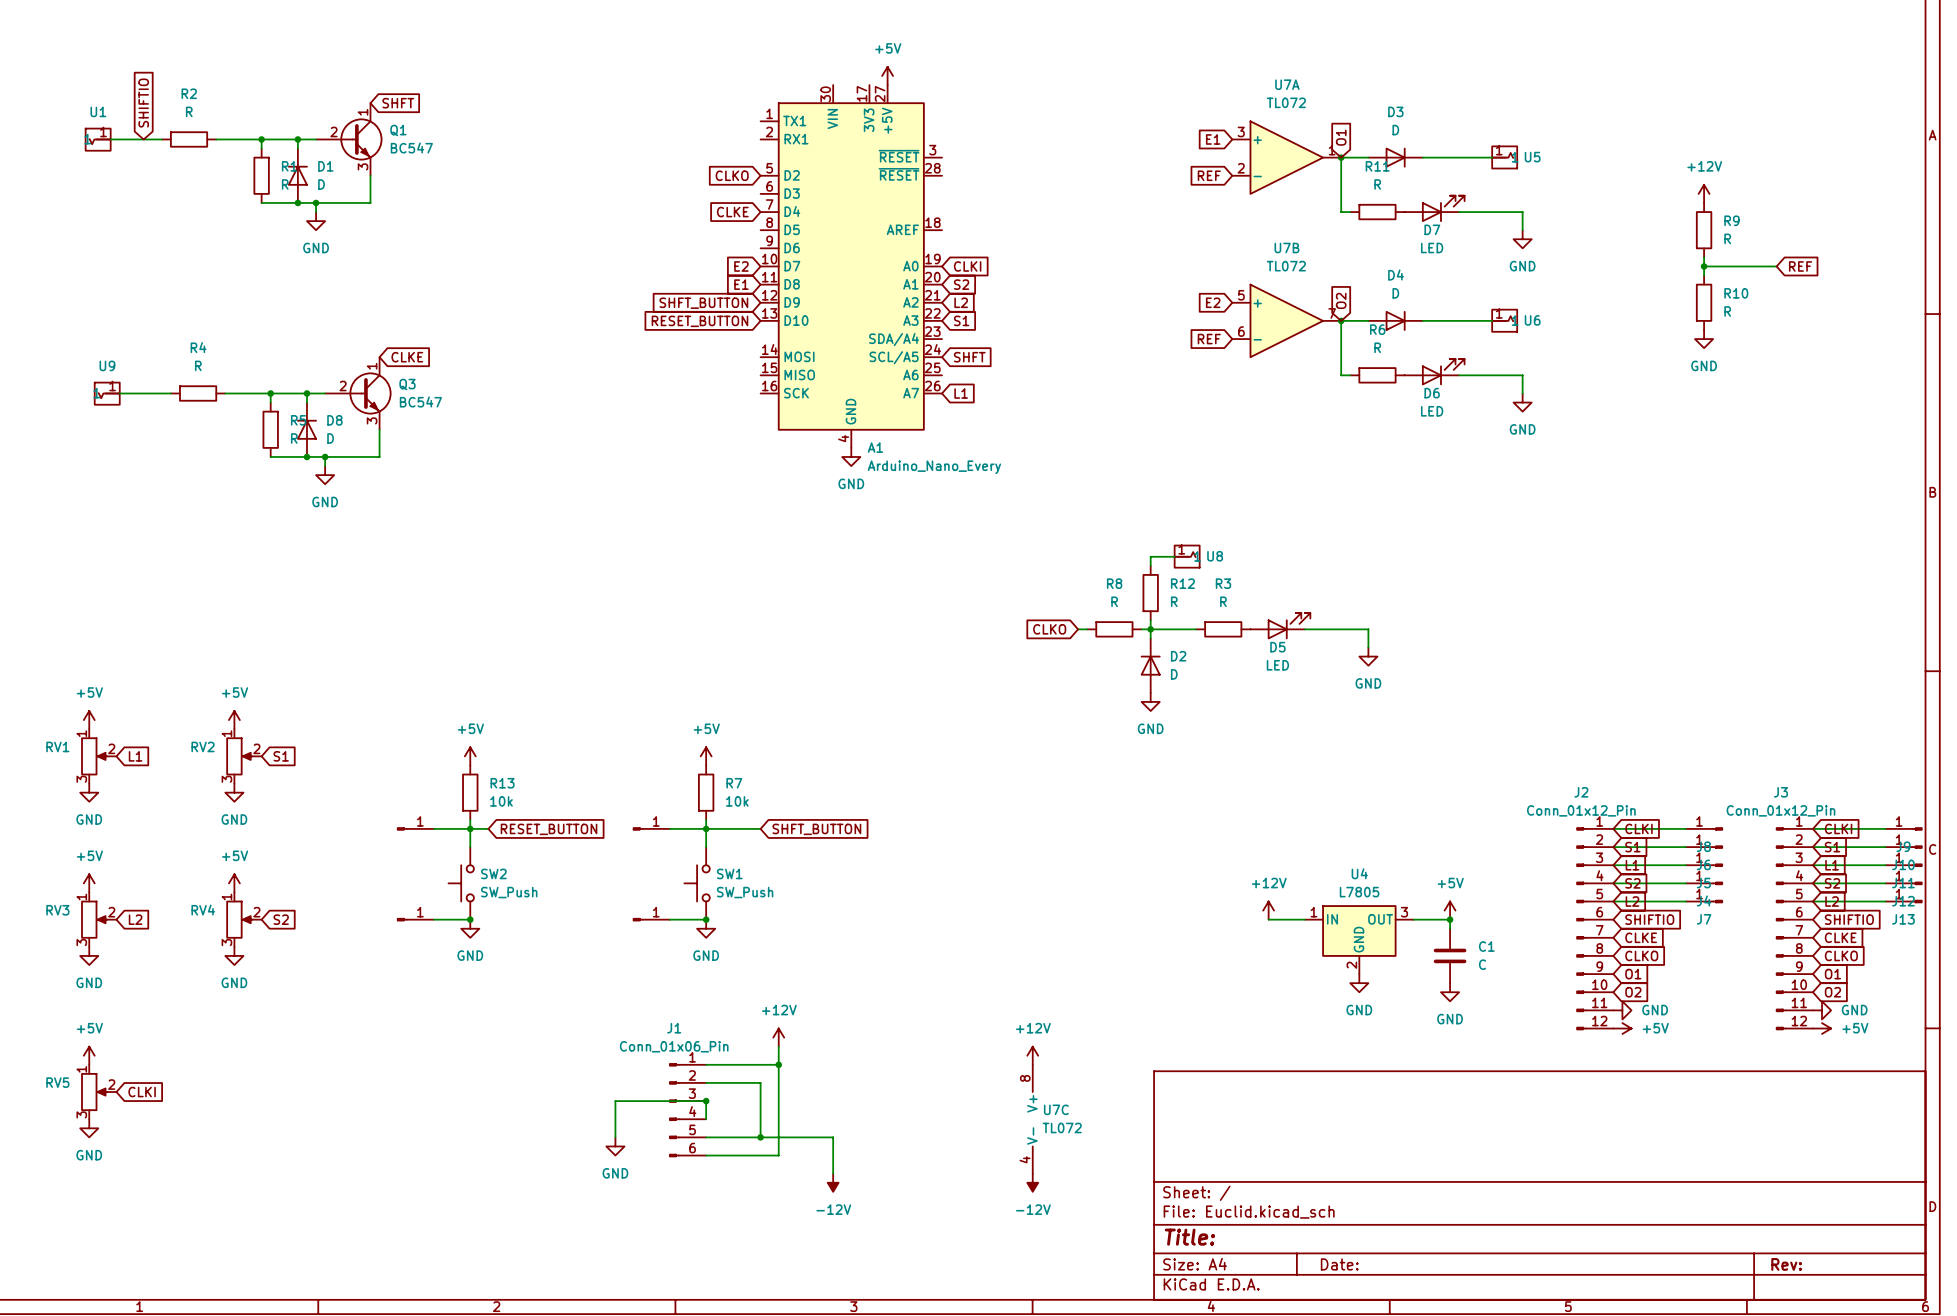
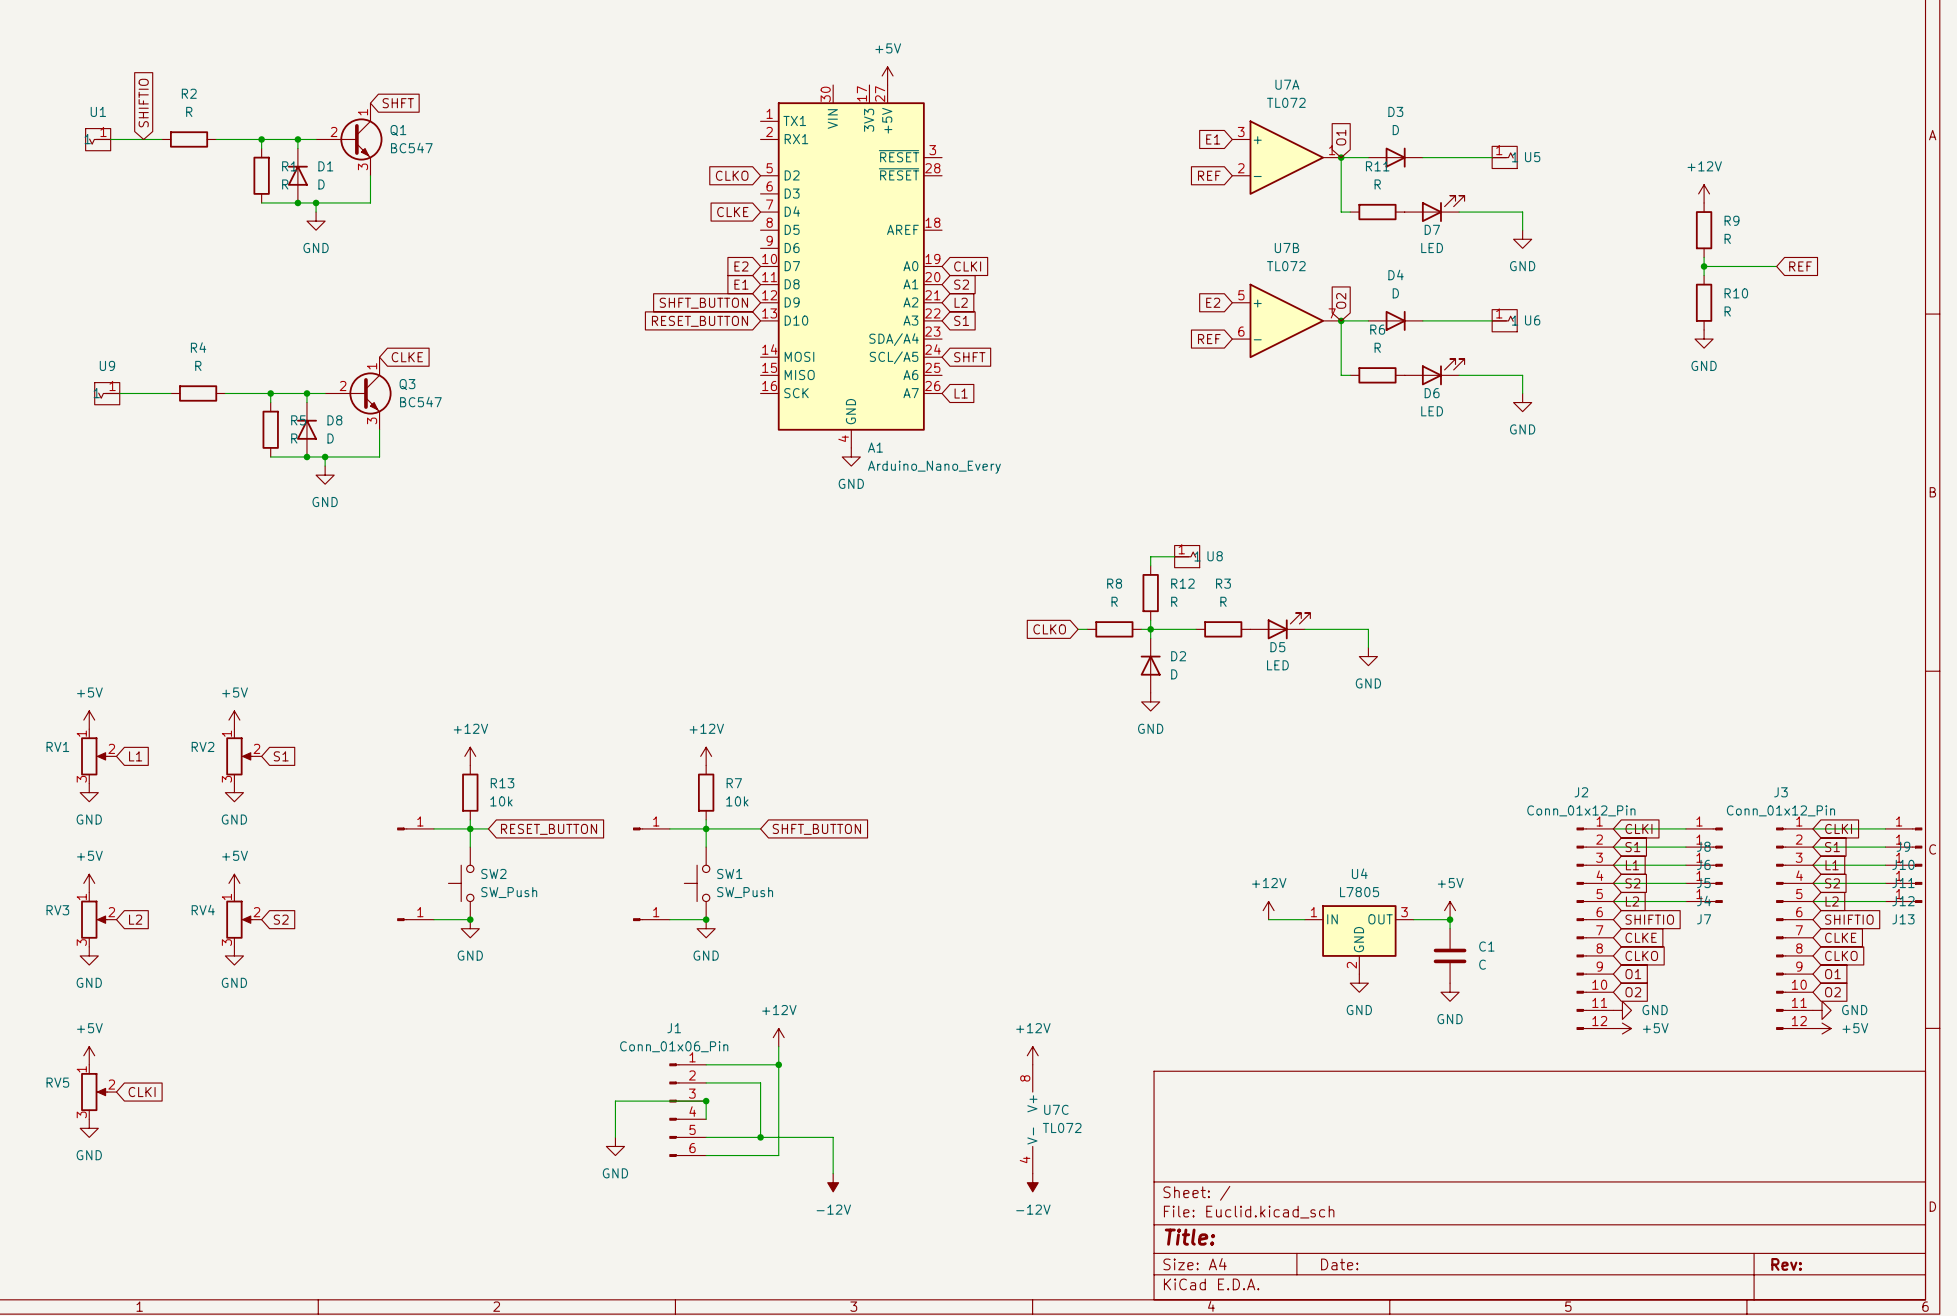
power symbol: +5V (470, 756) -> +12V (470, 756)
power symbol: +5V (706, 756) -> +12V (706, 756)

